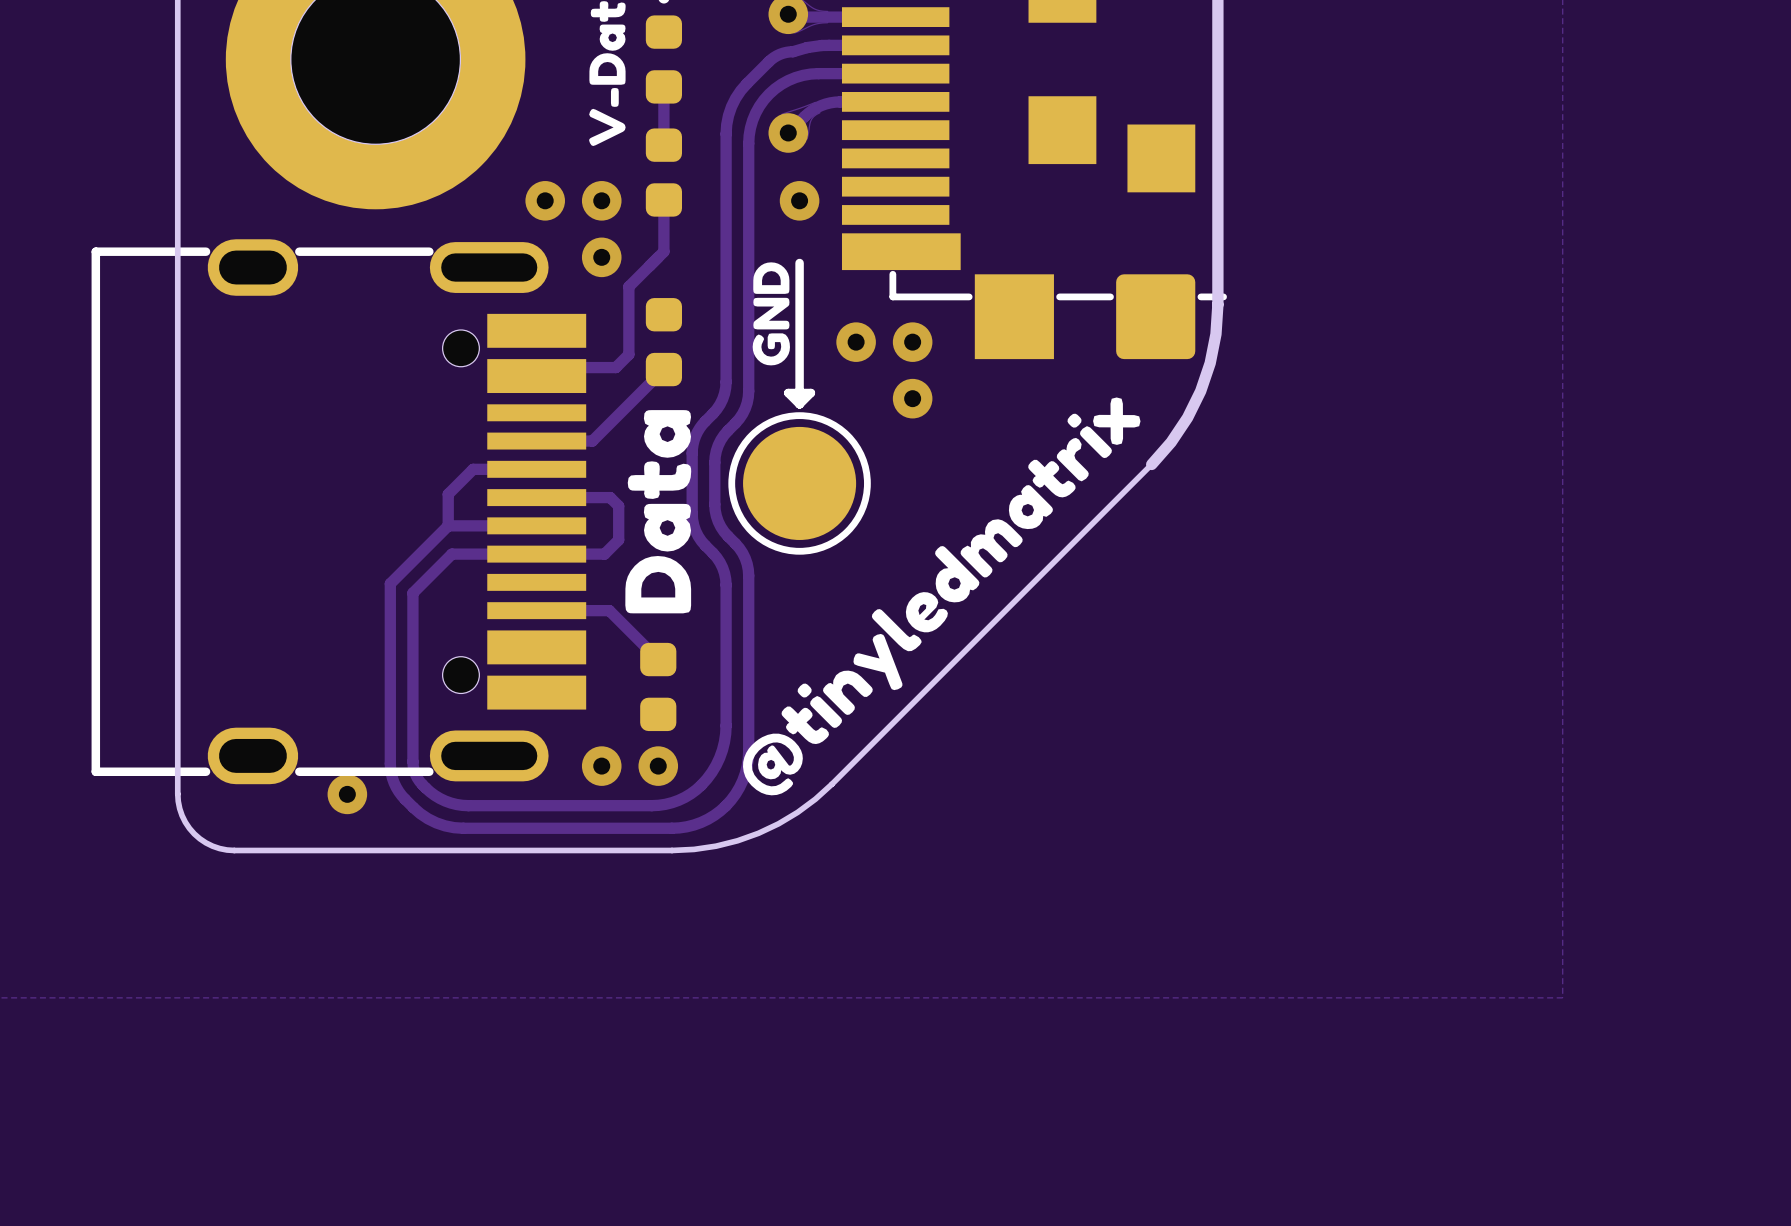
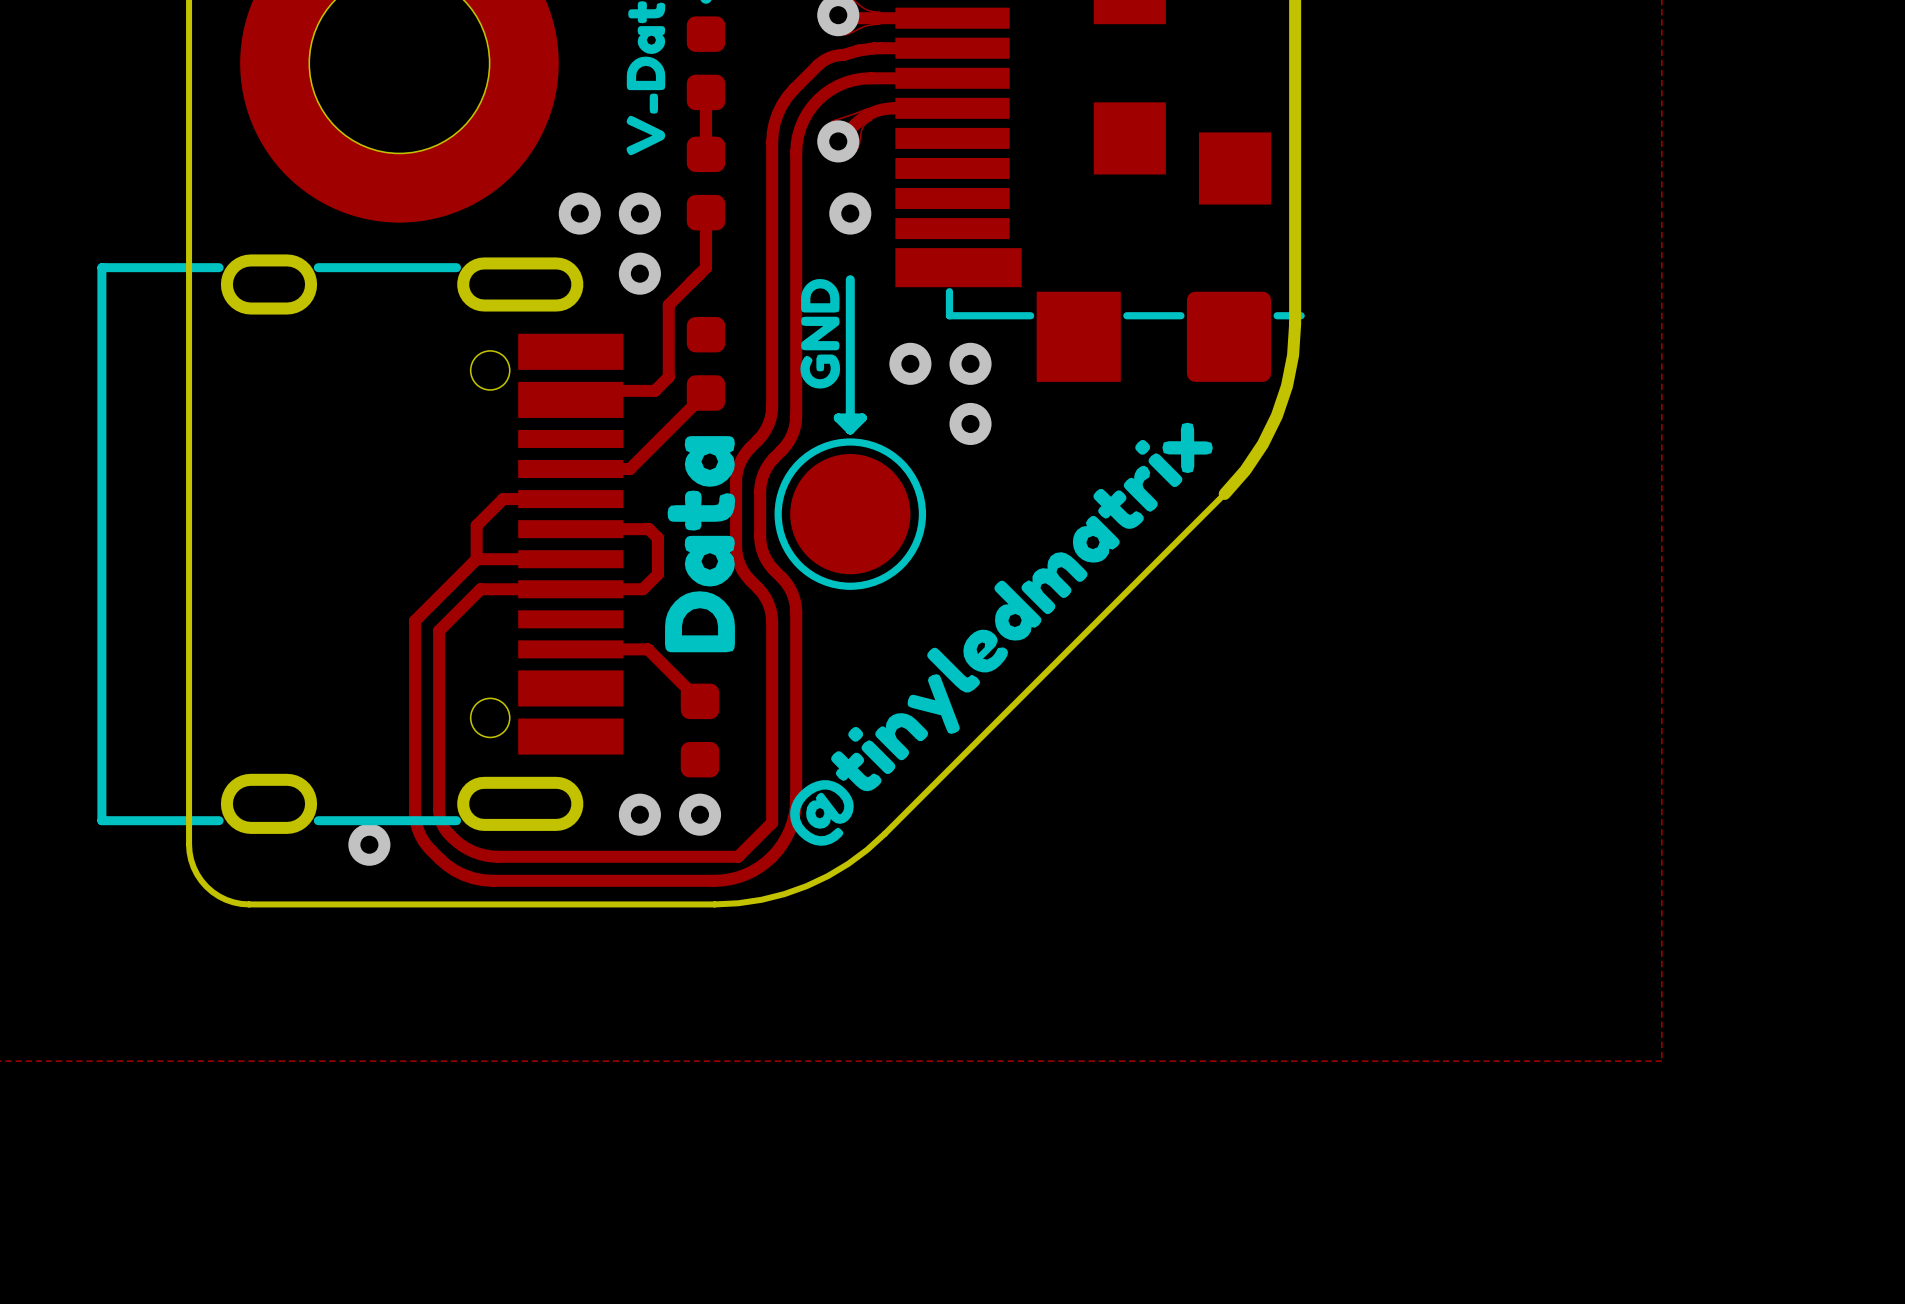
track: (726, 725) (724, 741) (719, 757) (711, 772) (701, 785) (678, 800) (651, 805) -> (772, 771) (772, 822) (738, 856) (693, 856)

